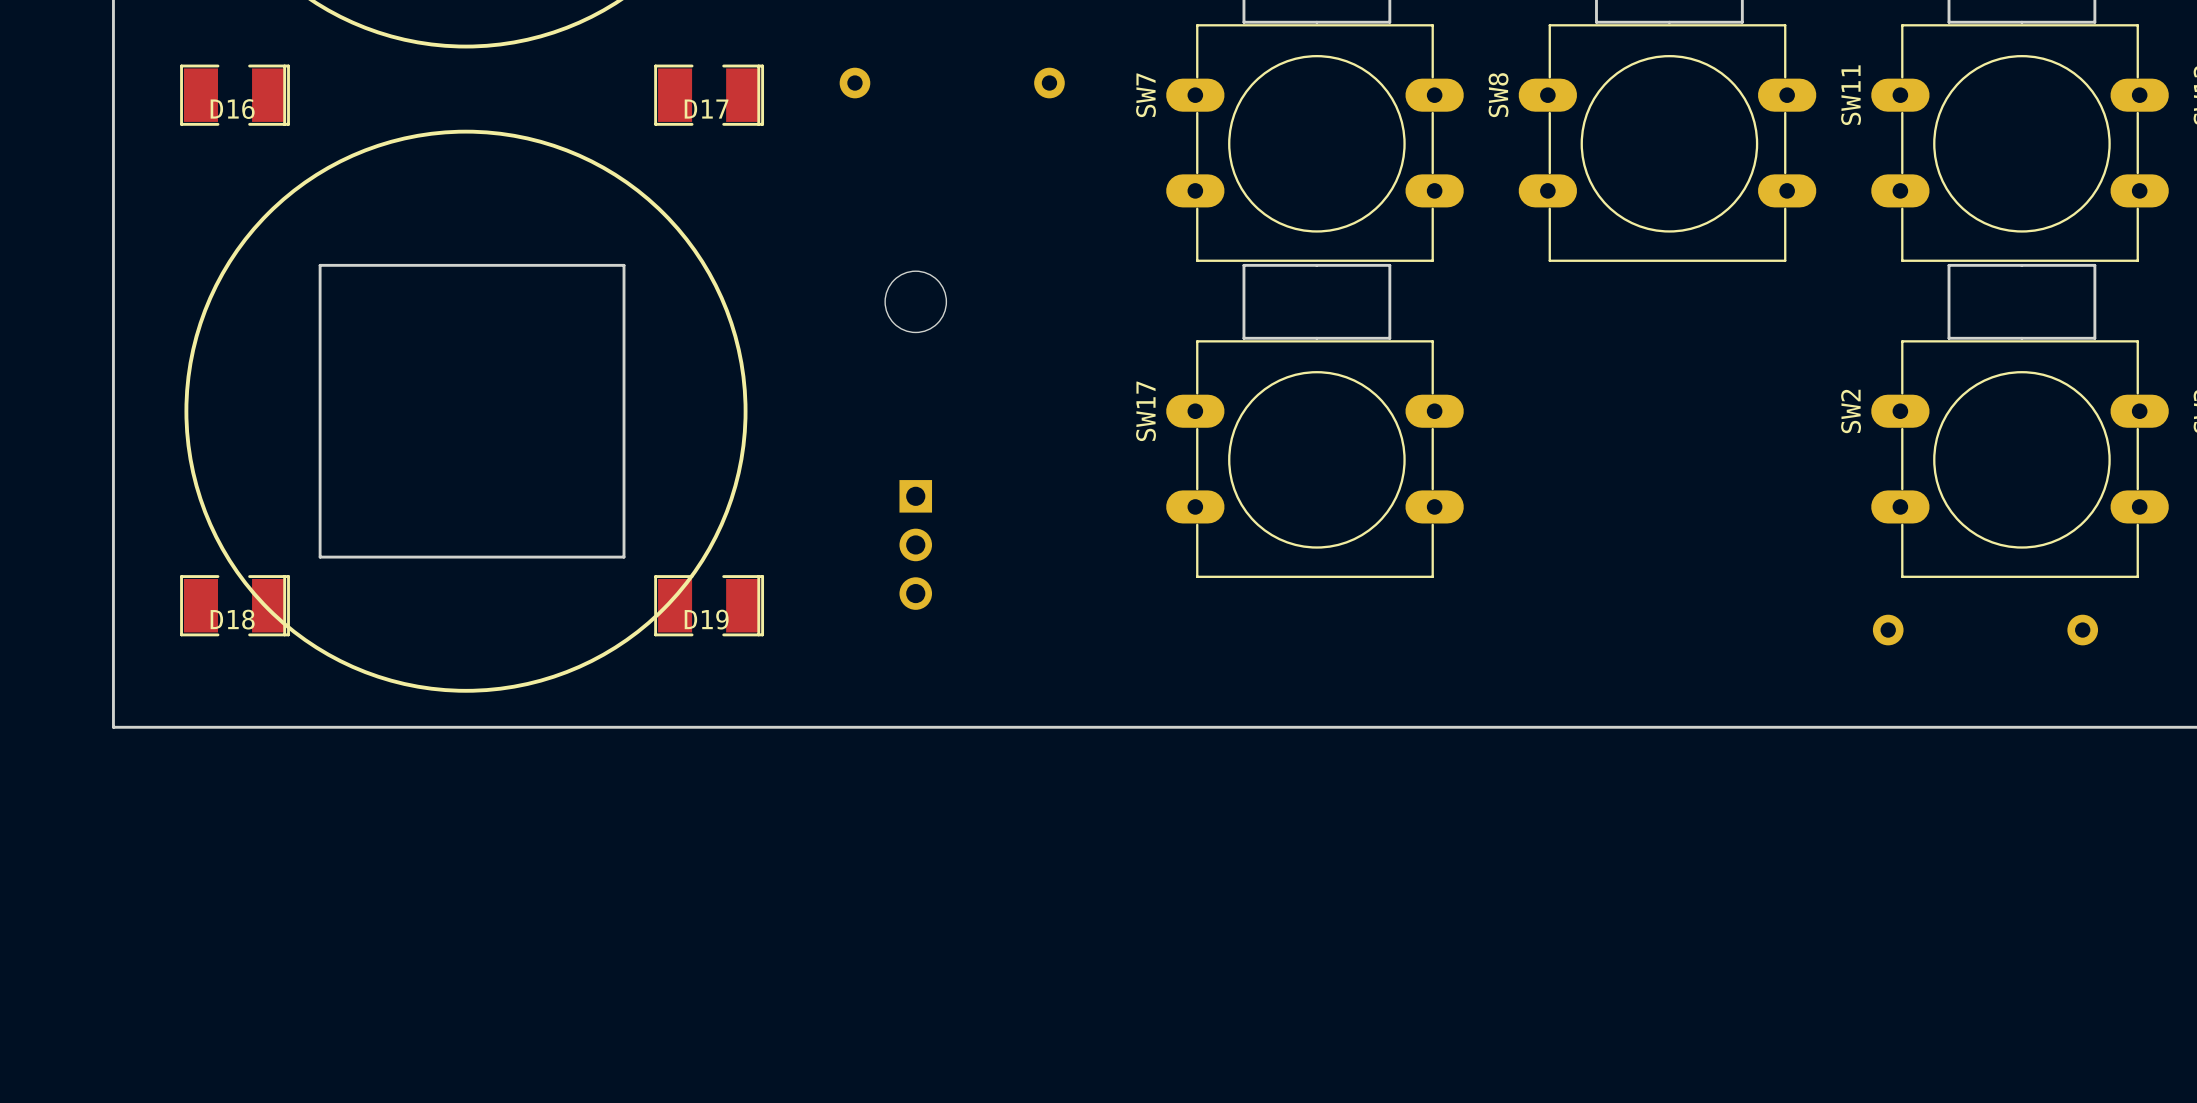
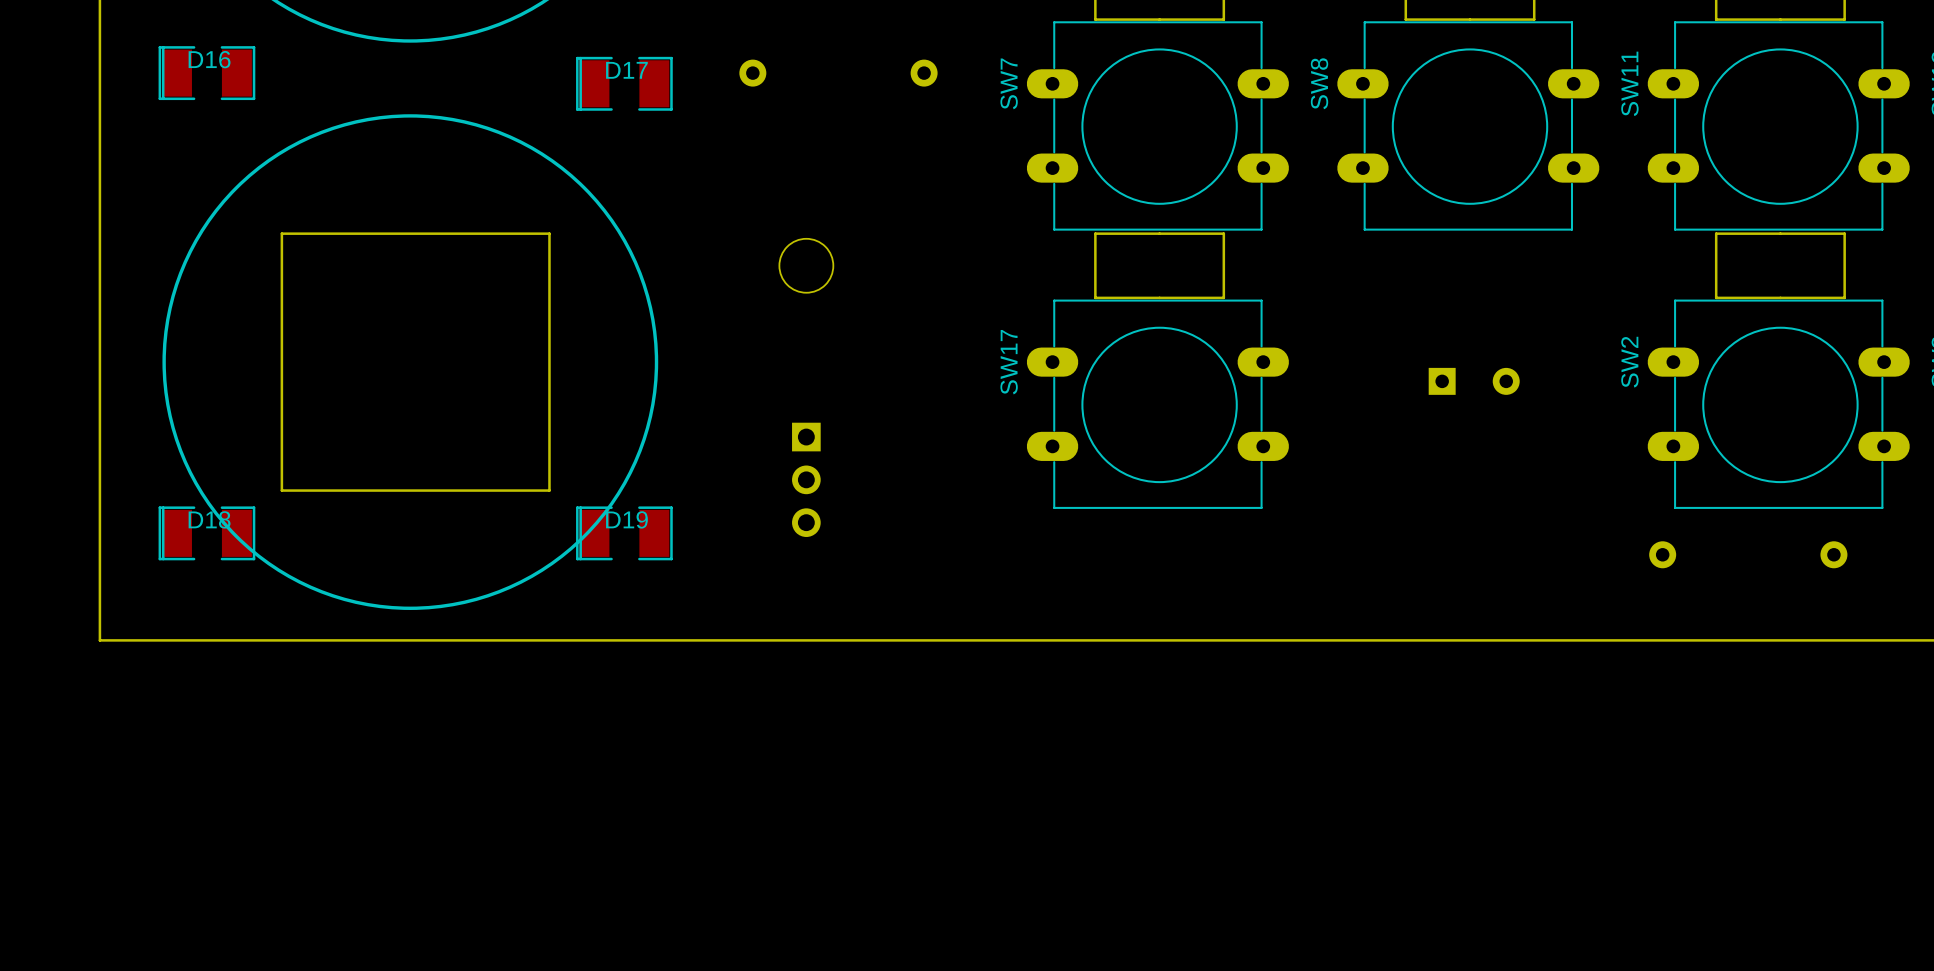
D16 rotation: 0° (235, 95) -> 180° (206, 73)
D17 rotation: 0° (709, 95) -> 180° (624, 83)
part: none -> (1474, 381)
D18 rotation: 0° (235, 605) -> 180° (206, 533)
D19 rotation: 0° (709, 605) -> 180° (624, 533)

